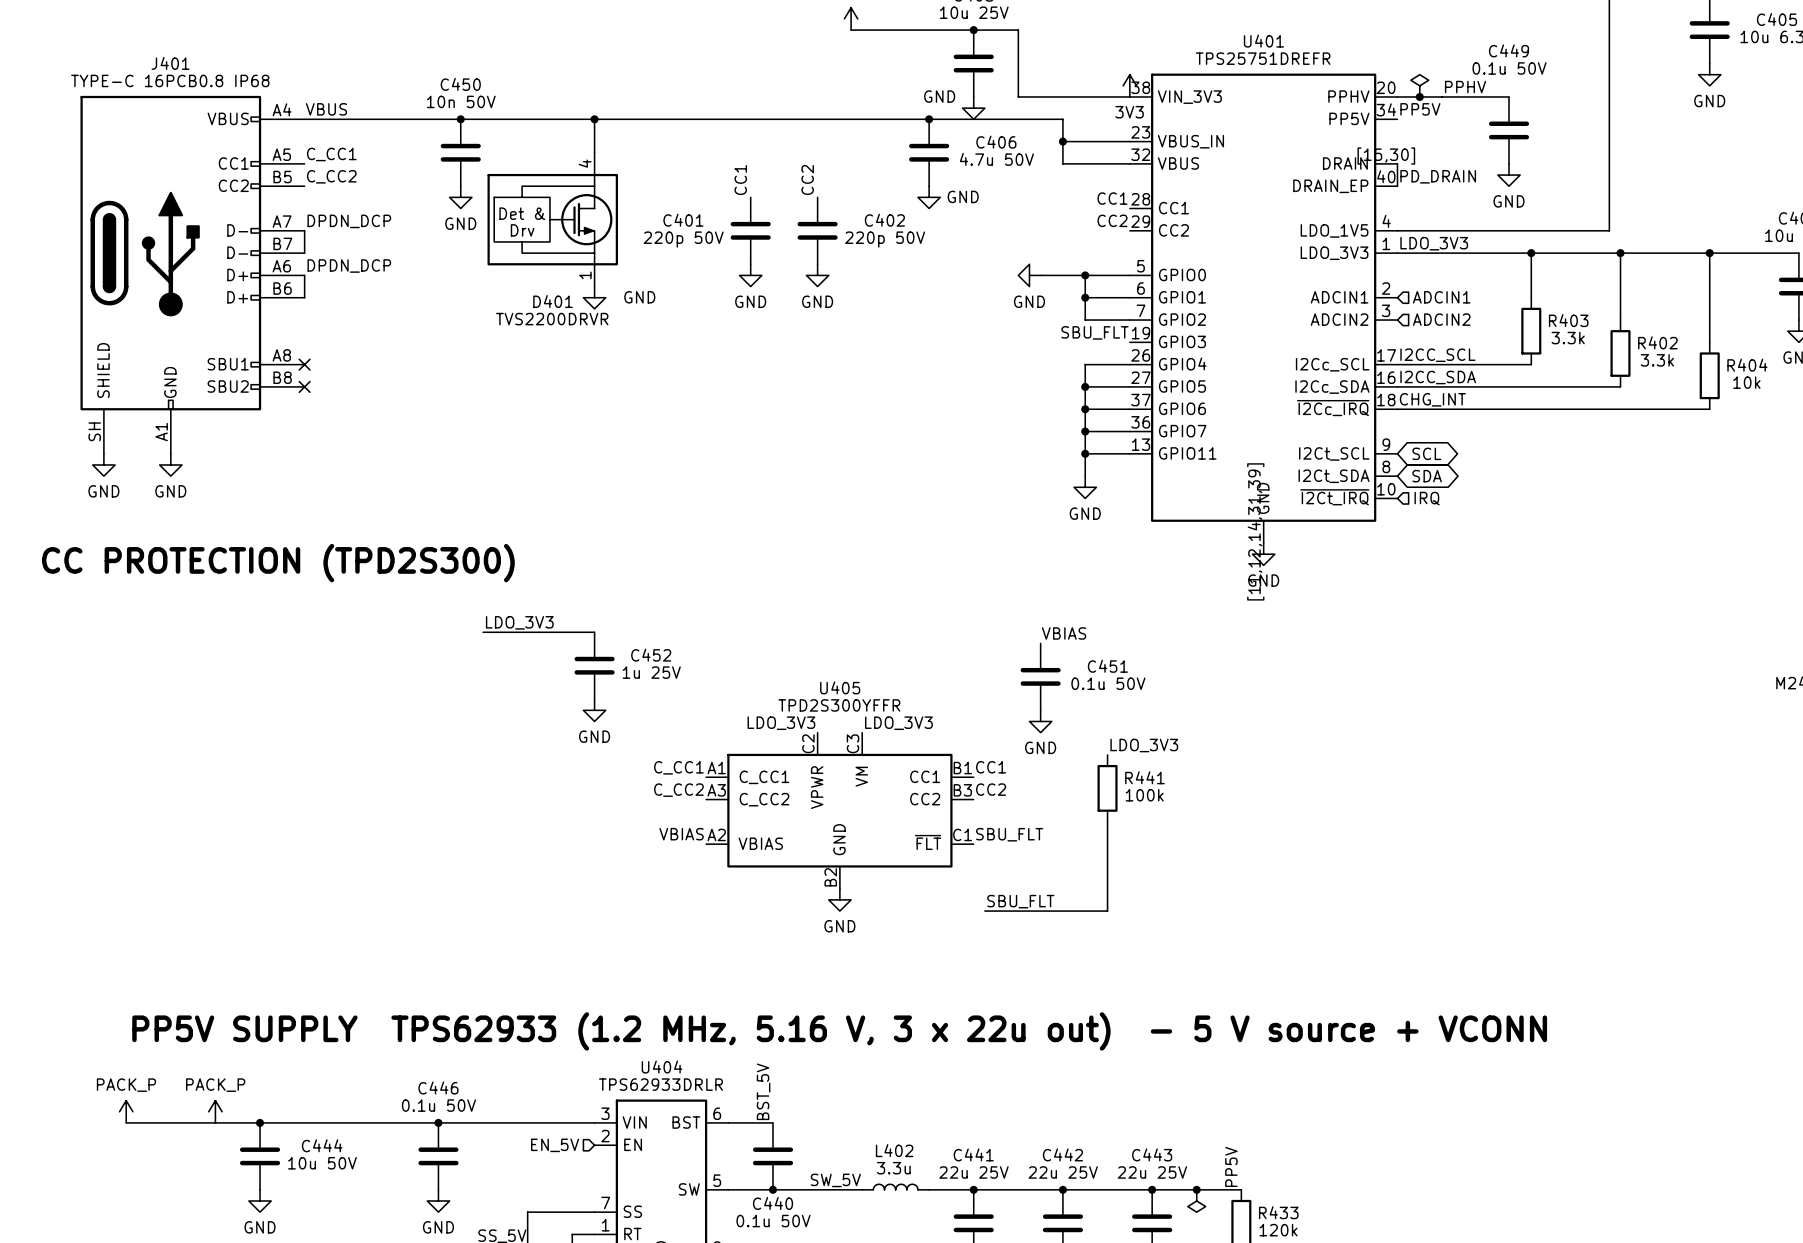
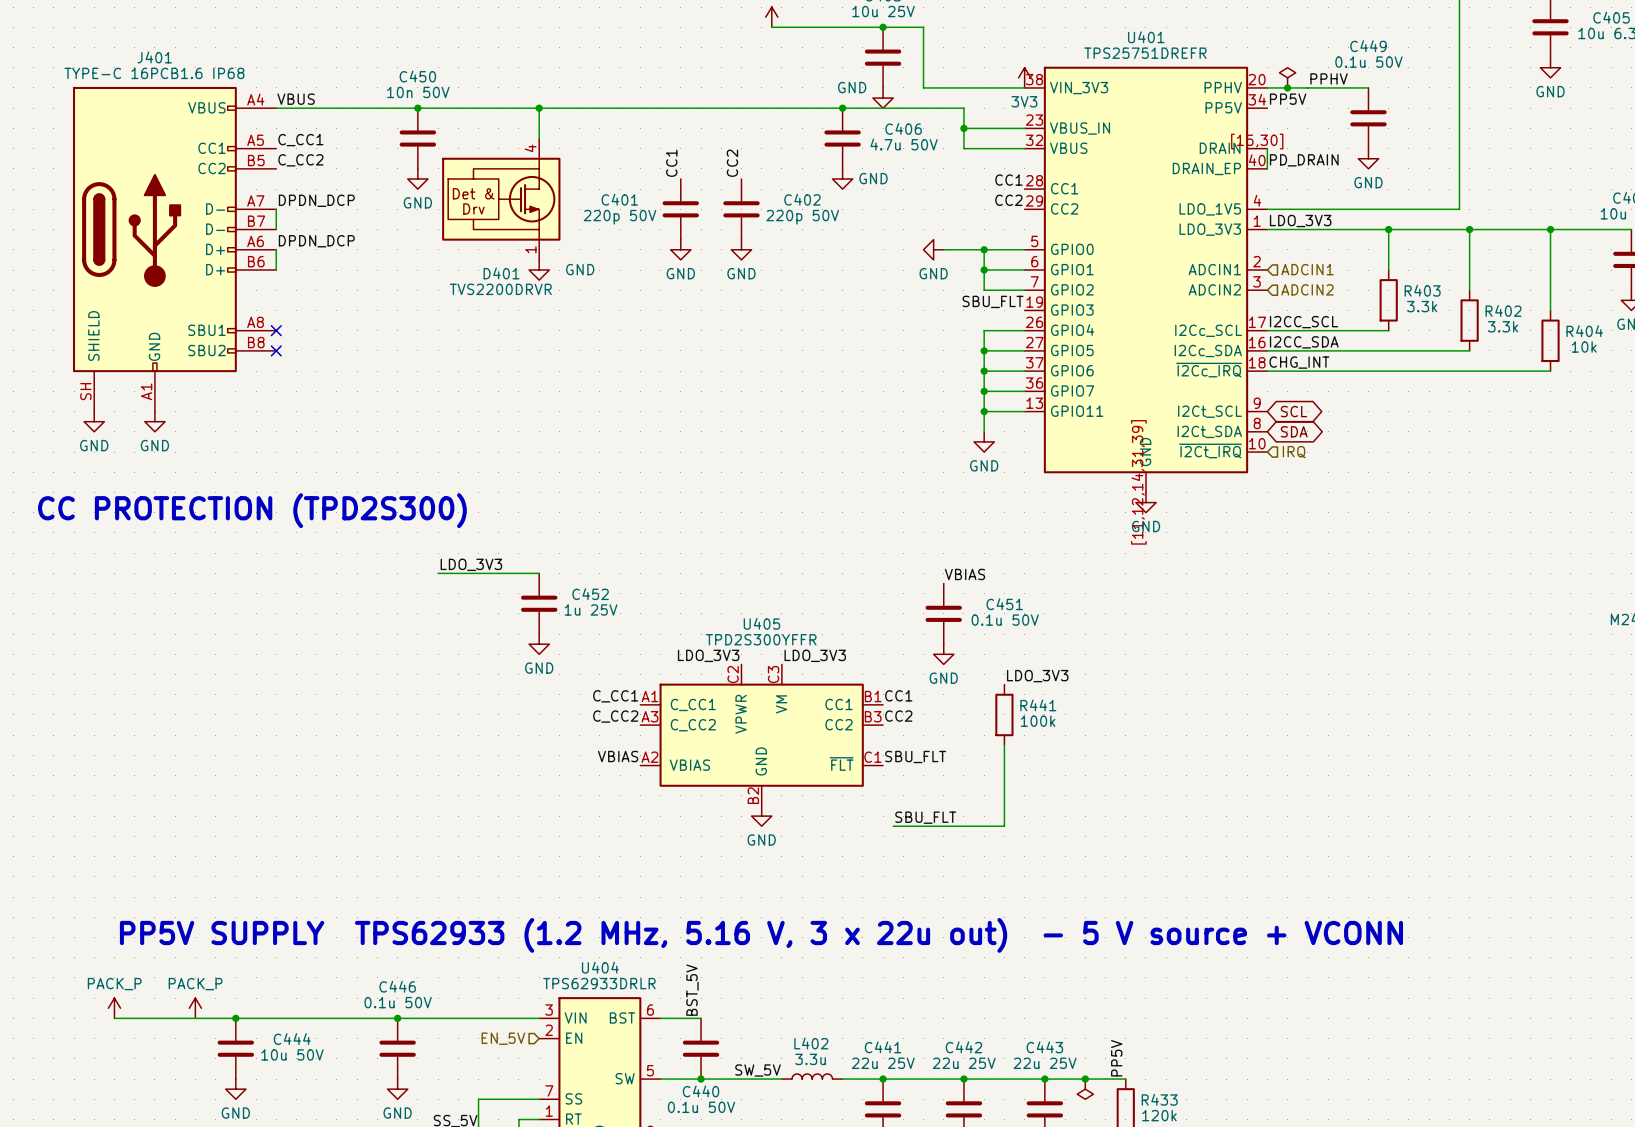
J401 value: TYPE-C 16PCB0.8 IP68 (170, 80) -> TYPE-C 16PCB1.6 IP68 (154, 73)

